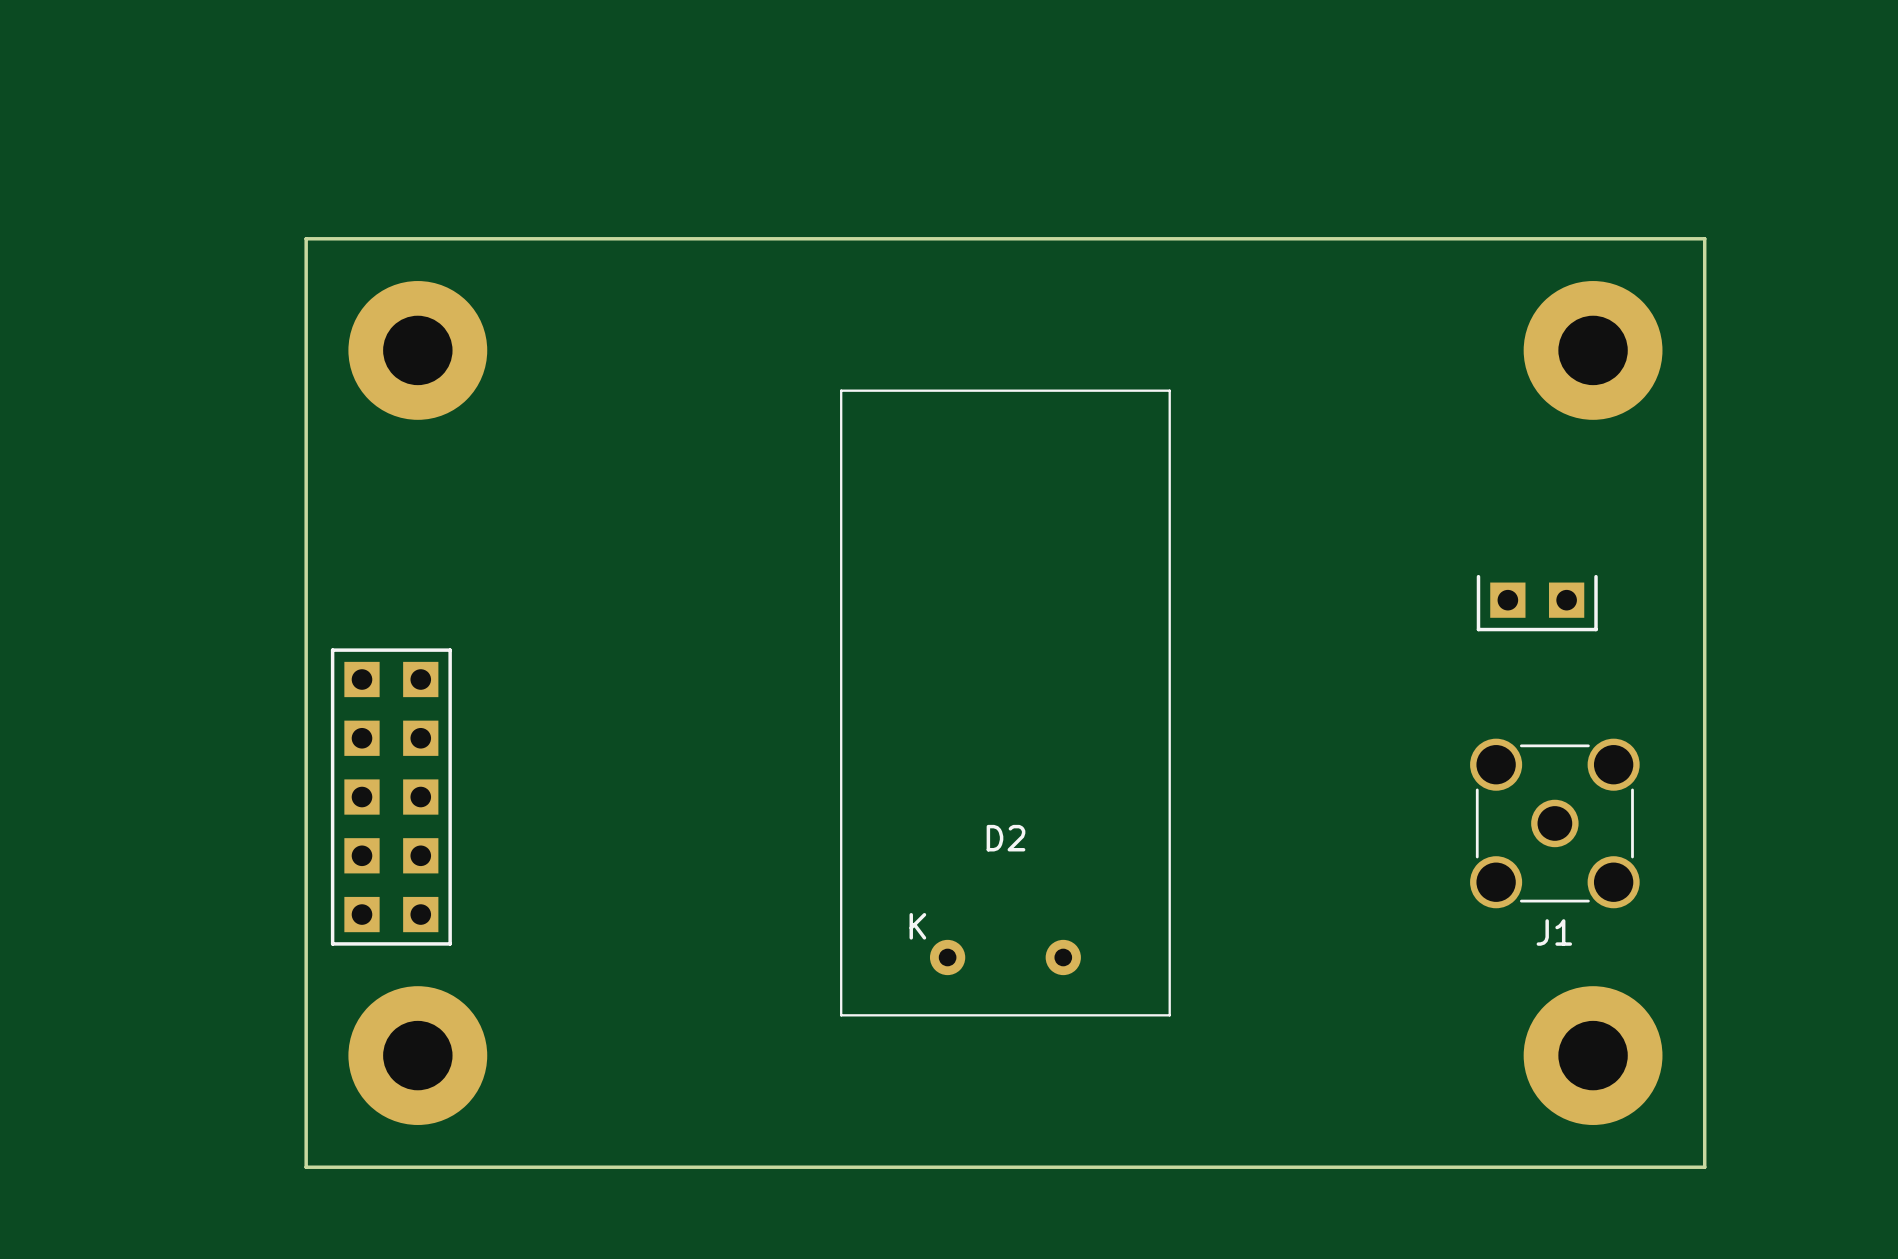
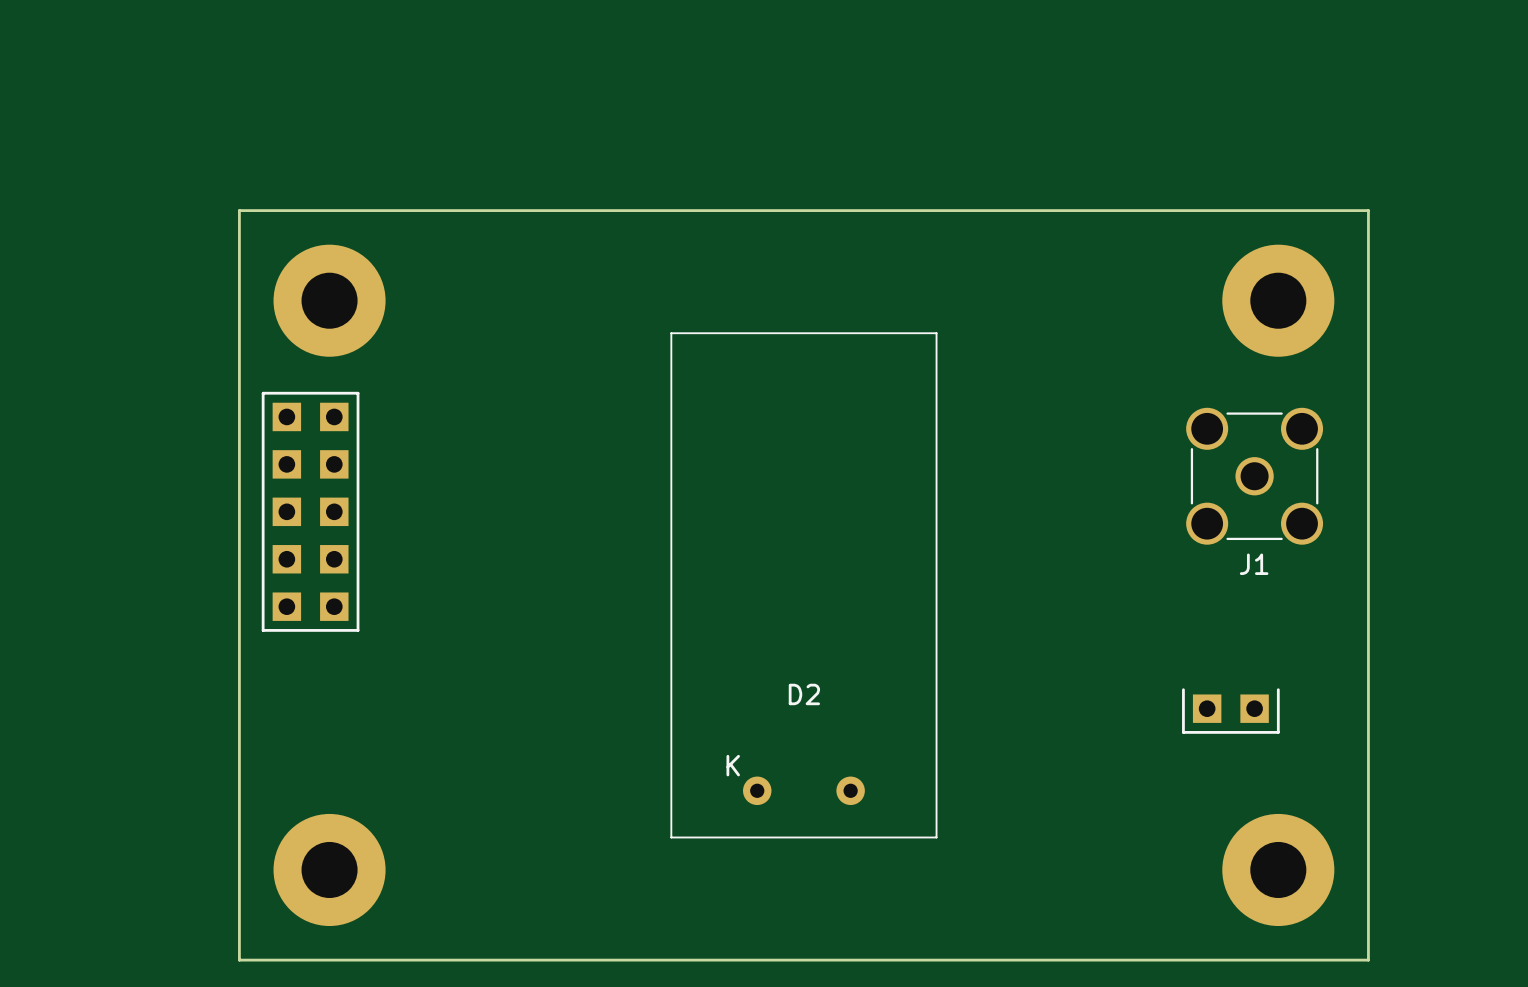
part position: (1537, 603) -> (1230, 711)
part position: (391, 797) -> (310, 511)
J1 position: (1554, 823) -> (1254, 476)

